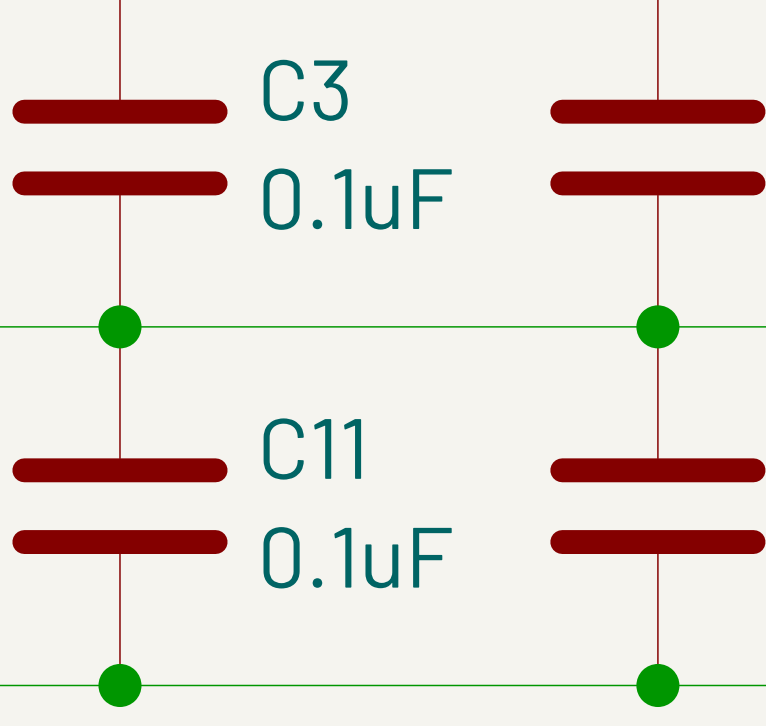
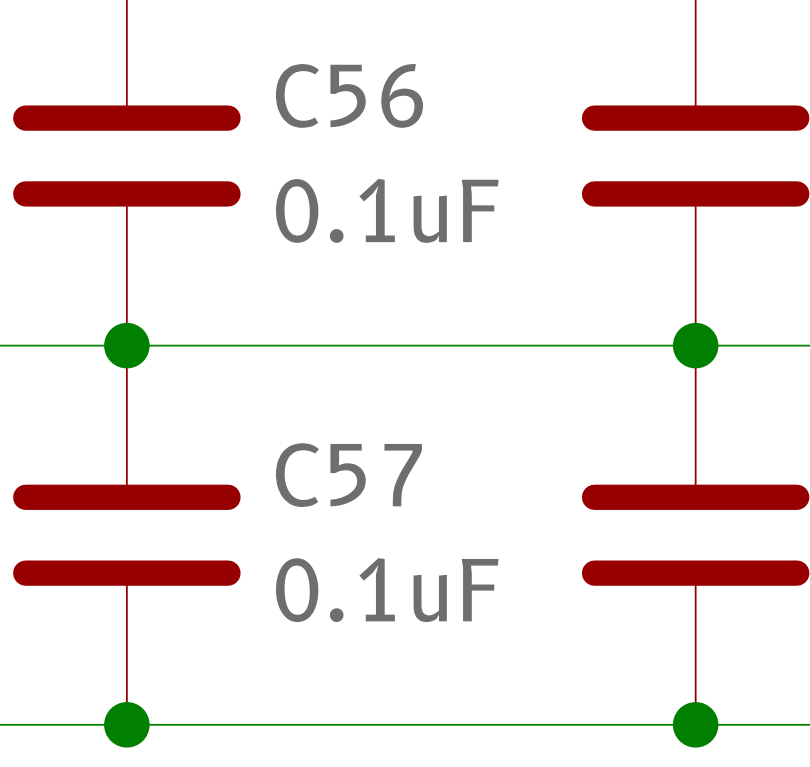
C3 name: C3 (305, 90) -> C56 (349, 95)
C11 name: C11 (312, 449) -> C57 (348, 475)

